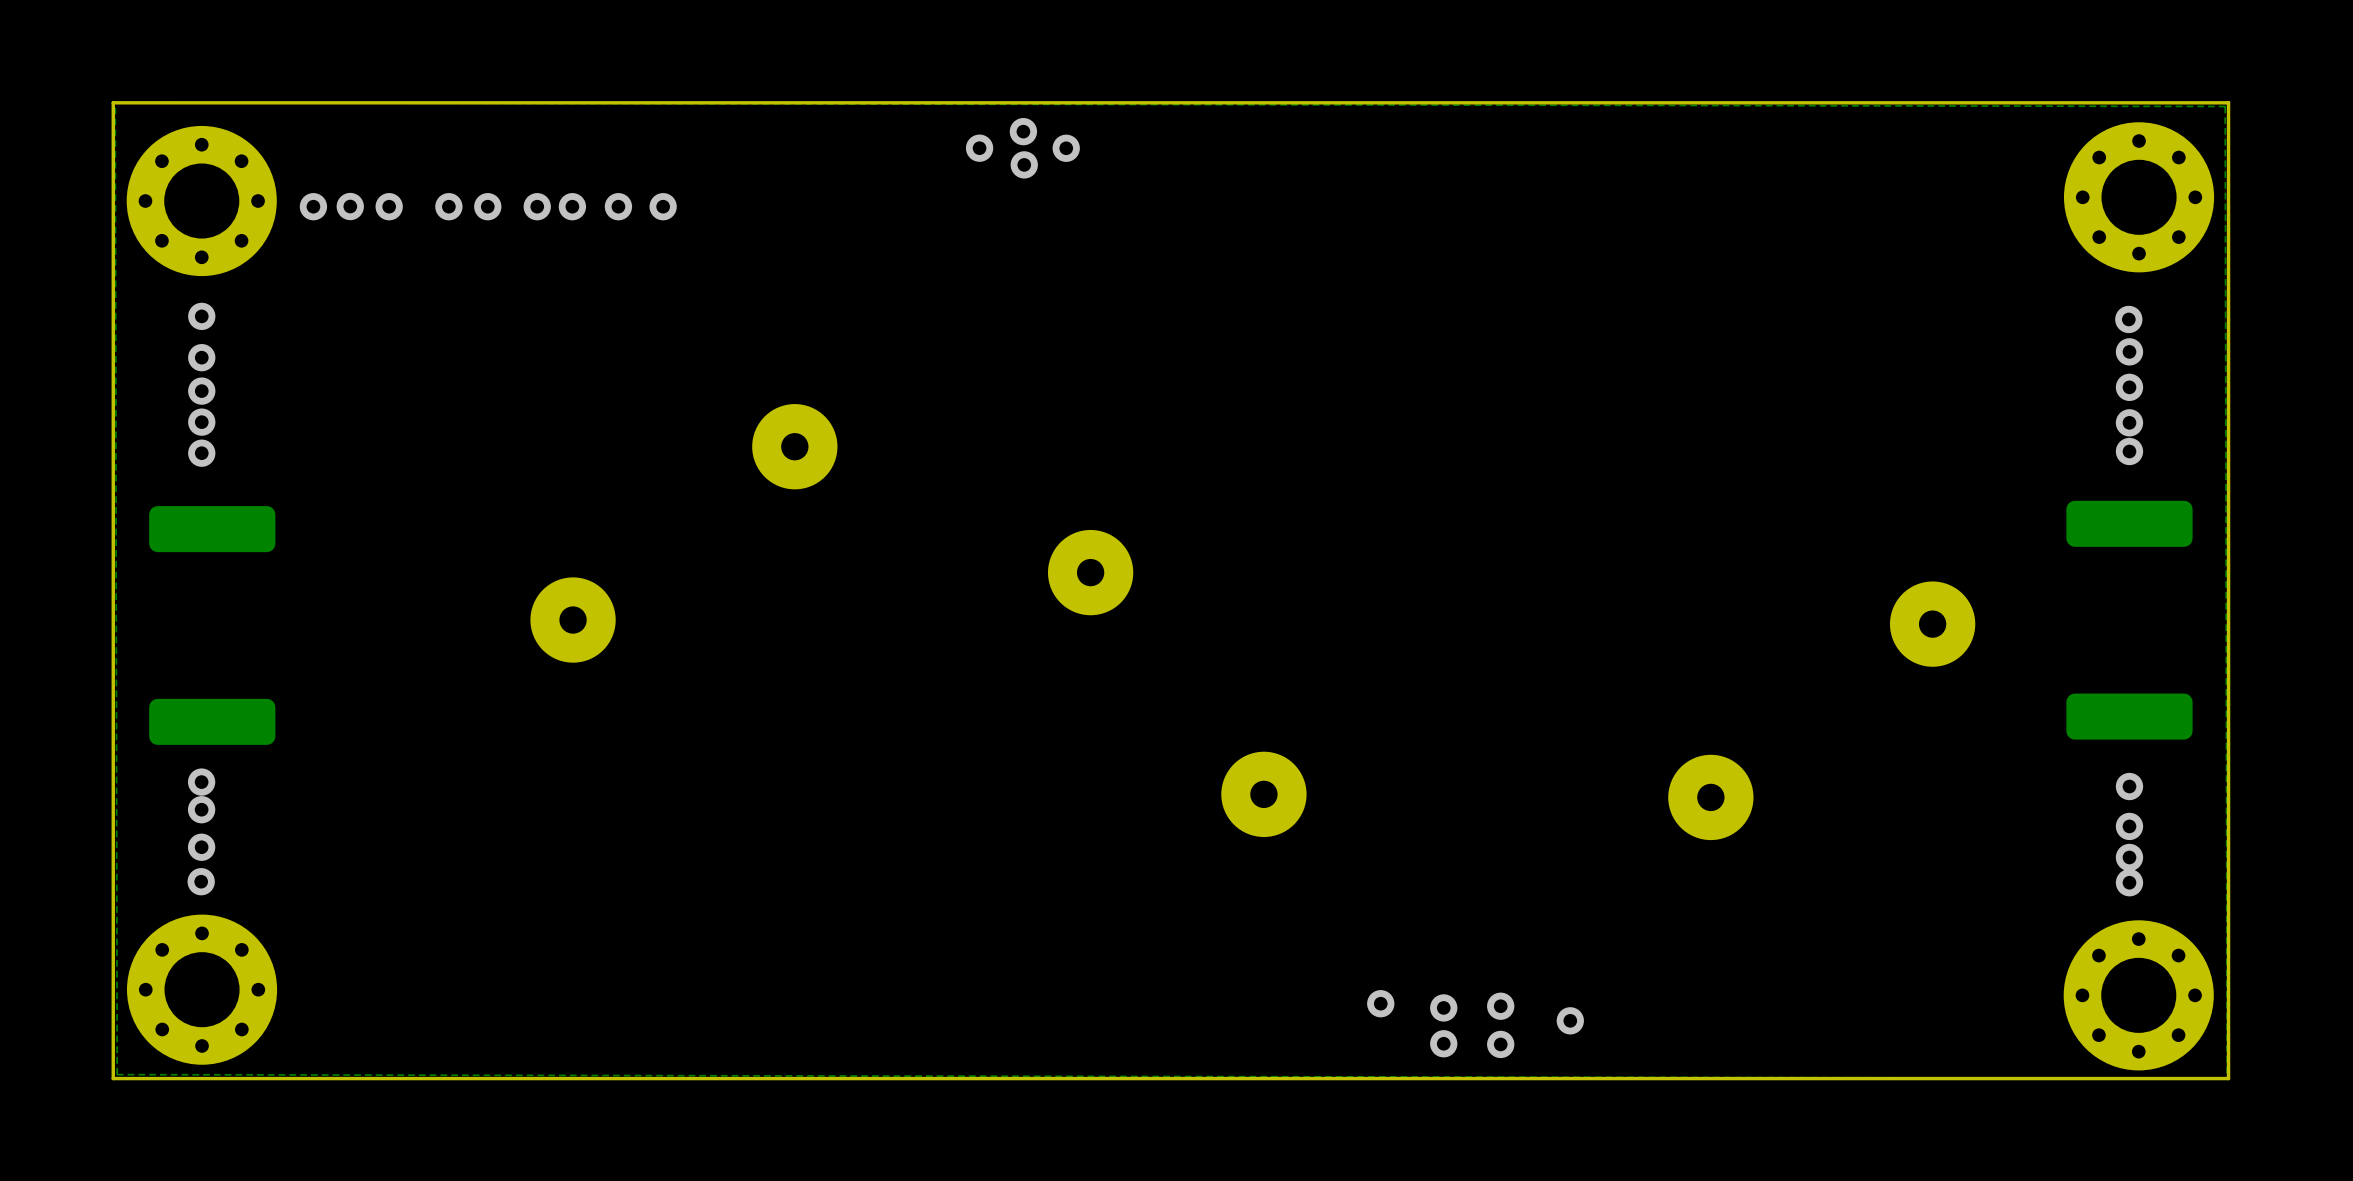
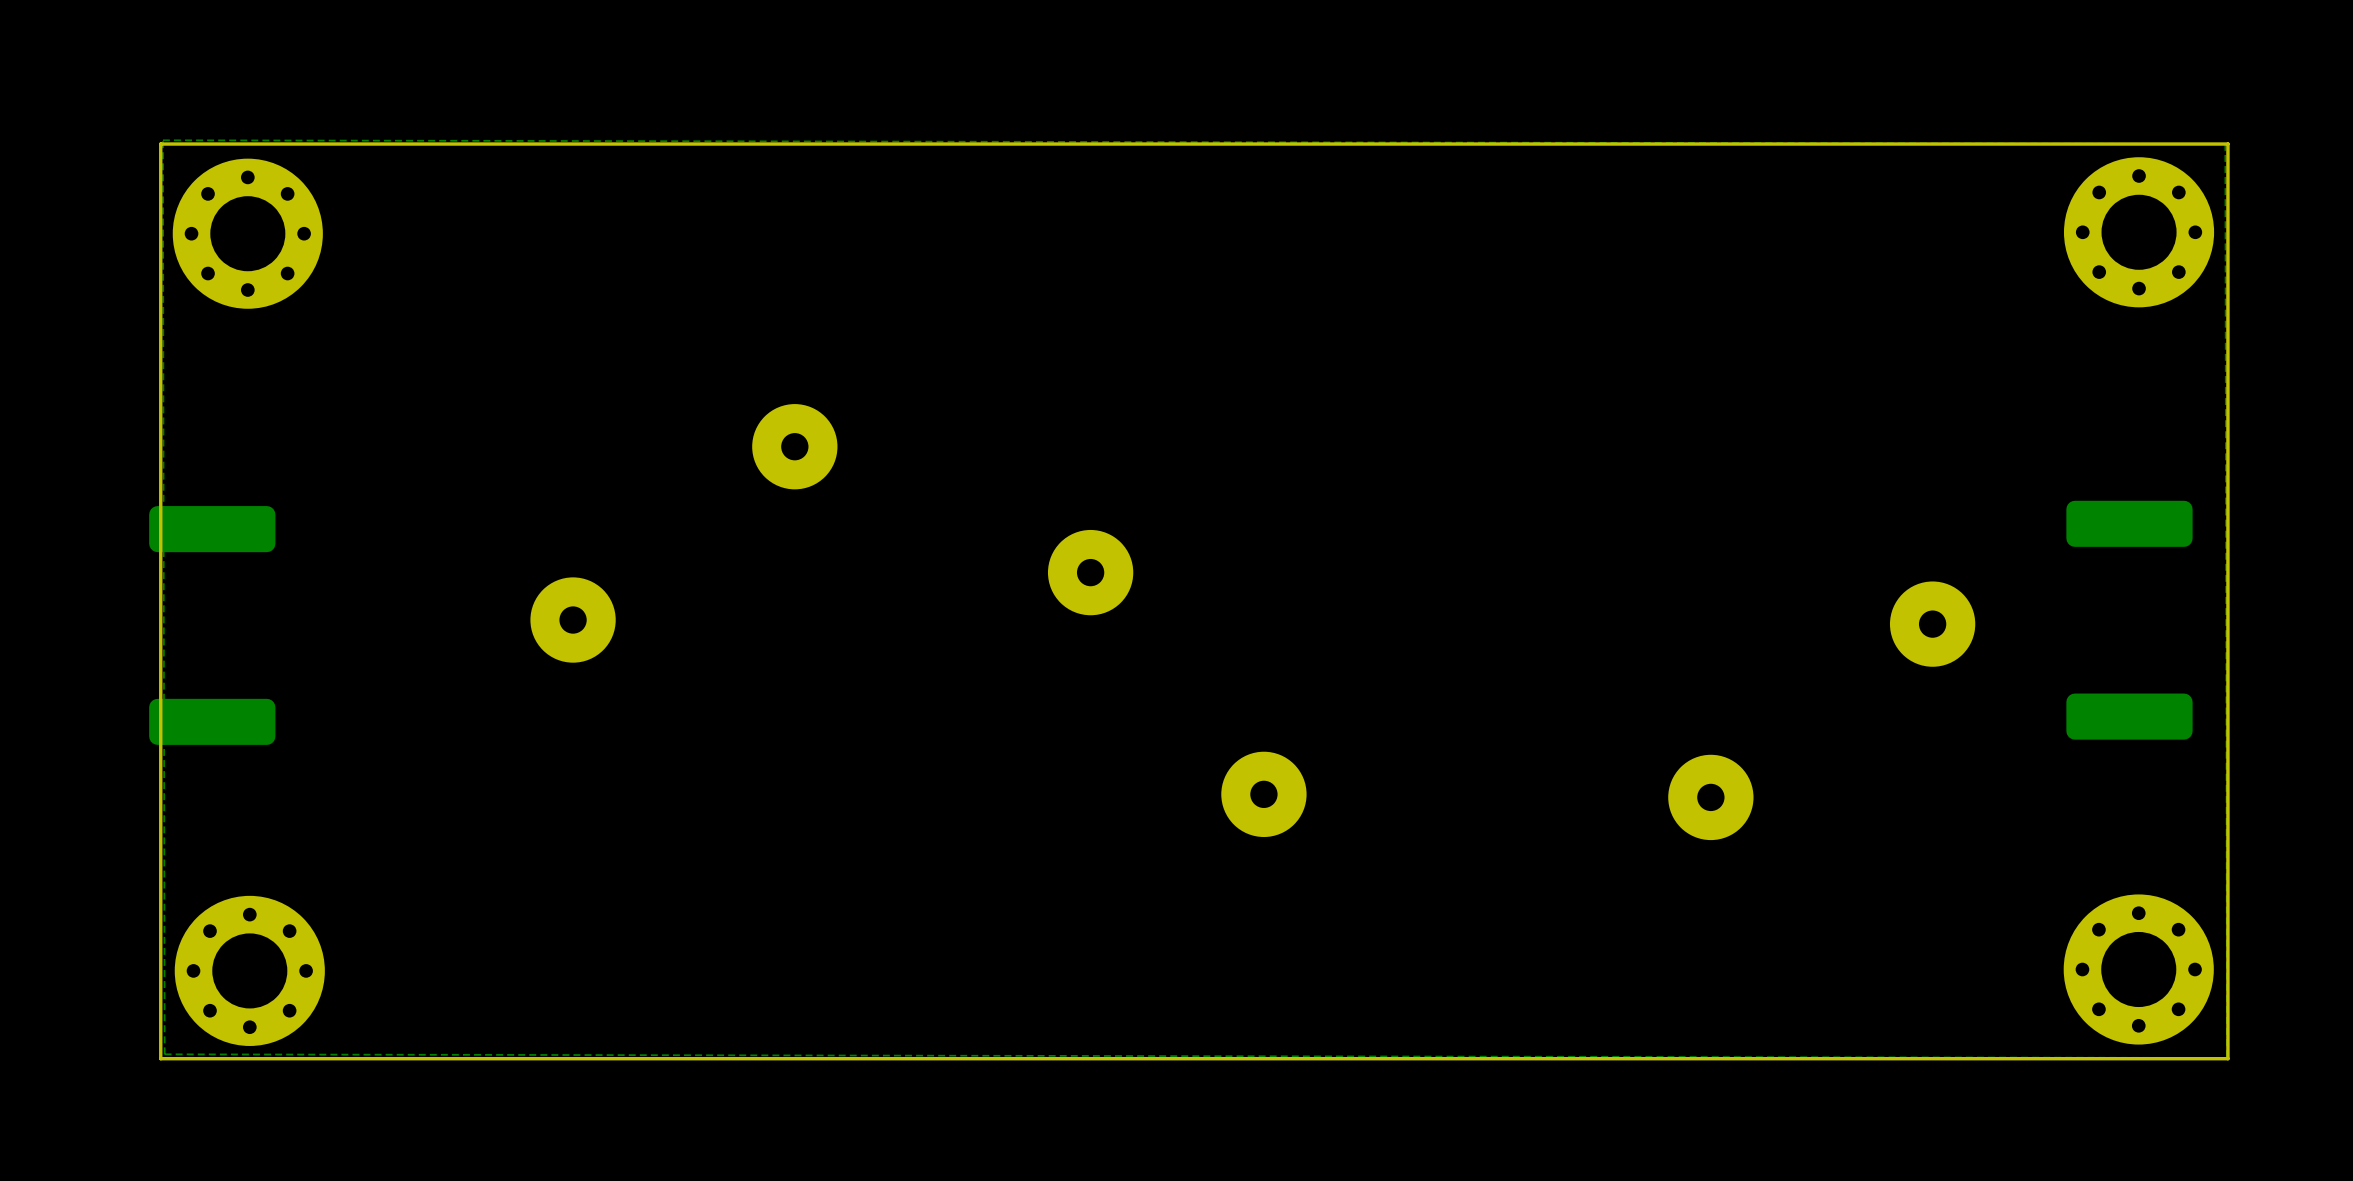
board edge: (2228, 102) (113, 102) (113, 1078) (2228, 1078) (2228, 102) -> (2227, 144) (2227, 1058) (160, 1058) (160, 144) (2227, 144)
via: (1023, 131) -> none
zone outline: (2225, 143) (2225, 106) (115, 102) (117, 1074) (2227, 1078) (2227, 1057) -> (2225, 143) (162, 140) (164, 1054) (2227, 1057)
via: (979, 148) -> none
via: (1066, 148) -> none
via: (1024, 164) -> none
part position: (2139, 197) -> (2139, 232)
part position: (201, 201) -> (247, 233)
via: (313, 206) -> none
via: (350, 206) -> none
via: (389, 206) -> none
via: (448, 206) -> none
via: (487, 206) -> none
via: (537, 206) -> none
via: (572, 206) -> none
via: (618, 206) -> none
via: (663, 206) -> none
via: (201, 316) -> none
via: (2128, 319) -> none
via: (2129, 351) -> none
via: (201, 357) -> none
via: (2129, 387) -> none
via: (201, 391) -> none
via: (201, 422) -> none
via: (2129, 422) -> none
via: (2129, 451) -> none
via: (201, 453) -> none
via: (201, 782) -> none
via: (2129, 786) -> none
via: (201, 809) -> none
via: (2129, 826) -> none
via: (201, 847) -> none
via: (2129, 857) -> none
via: (201, 881) -> none
via: (2129, 882) -> none
part position: (202, 989) -> (249, 970)
part position: (2138, 995) -> (2138, 969)
via: (1380, 1003) -> none
via: (1500, 1006) -> none
via: (1443, 1007) -> none
via: (1570, 1020) -> none
via: (1443, 1043) -> none
via: (1500, 1044) -> none

